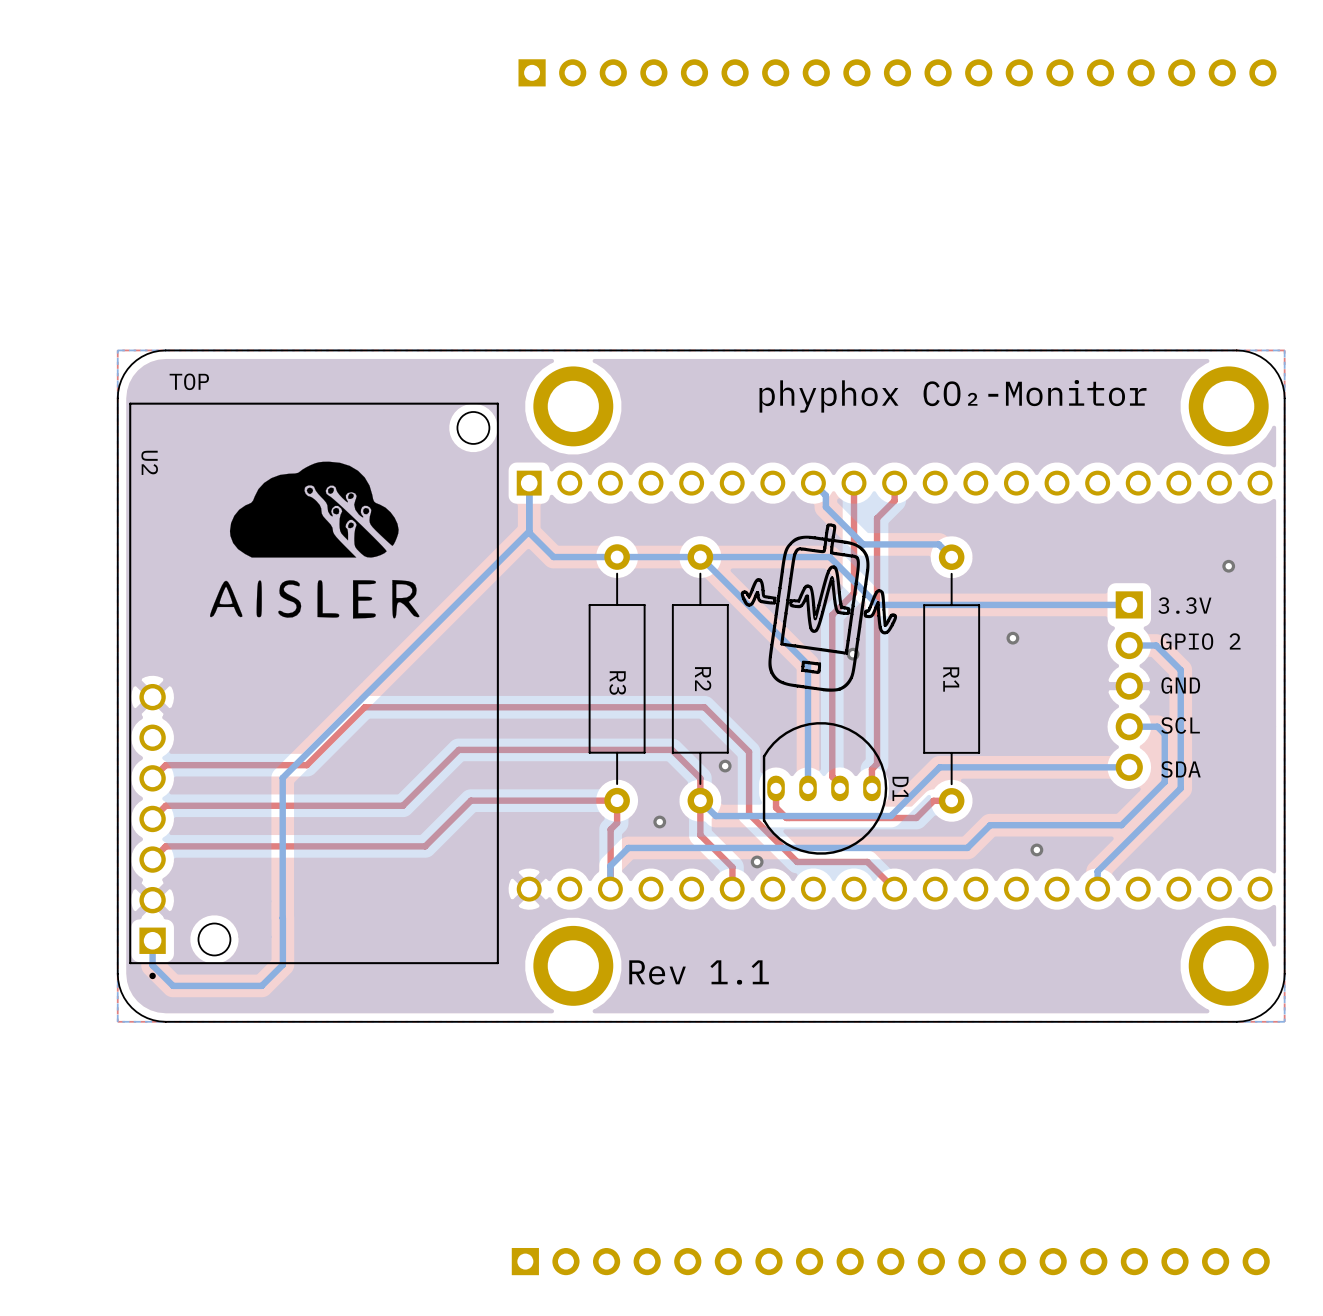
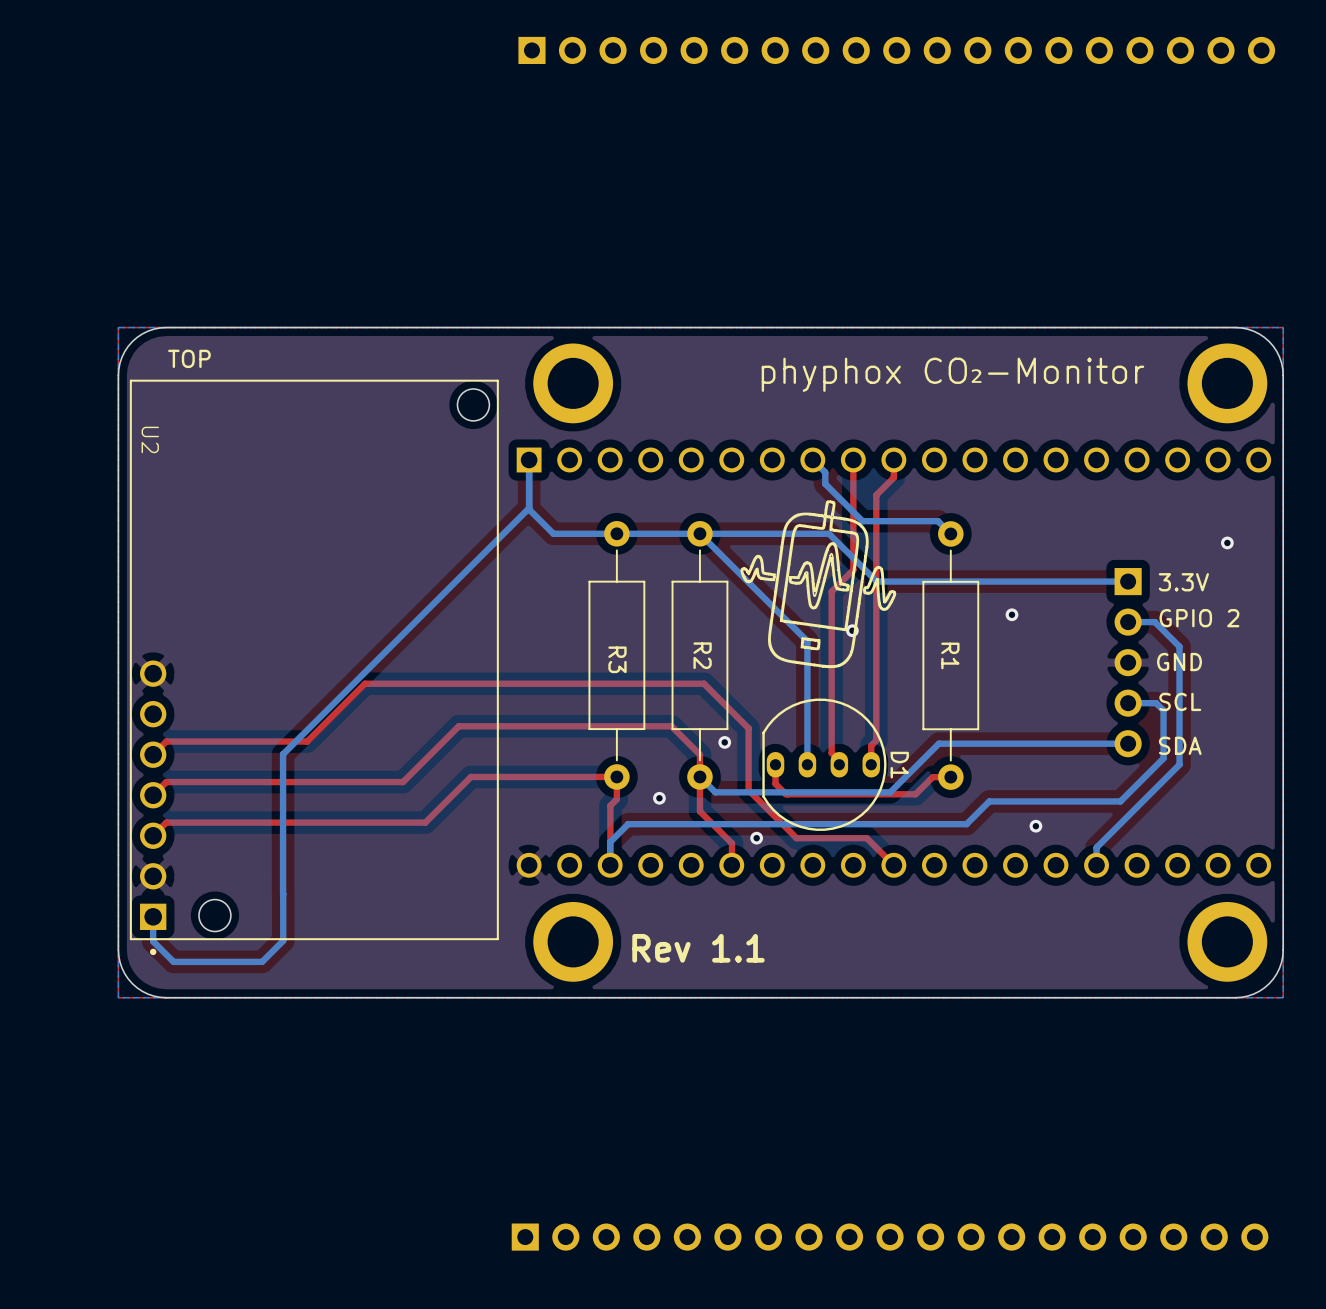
drawing: [210, 461, 420, 619] -> none

